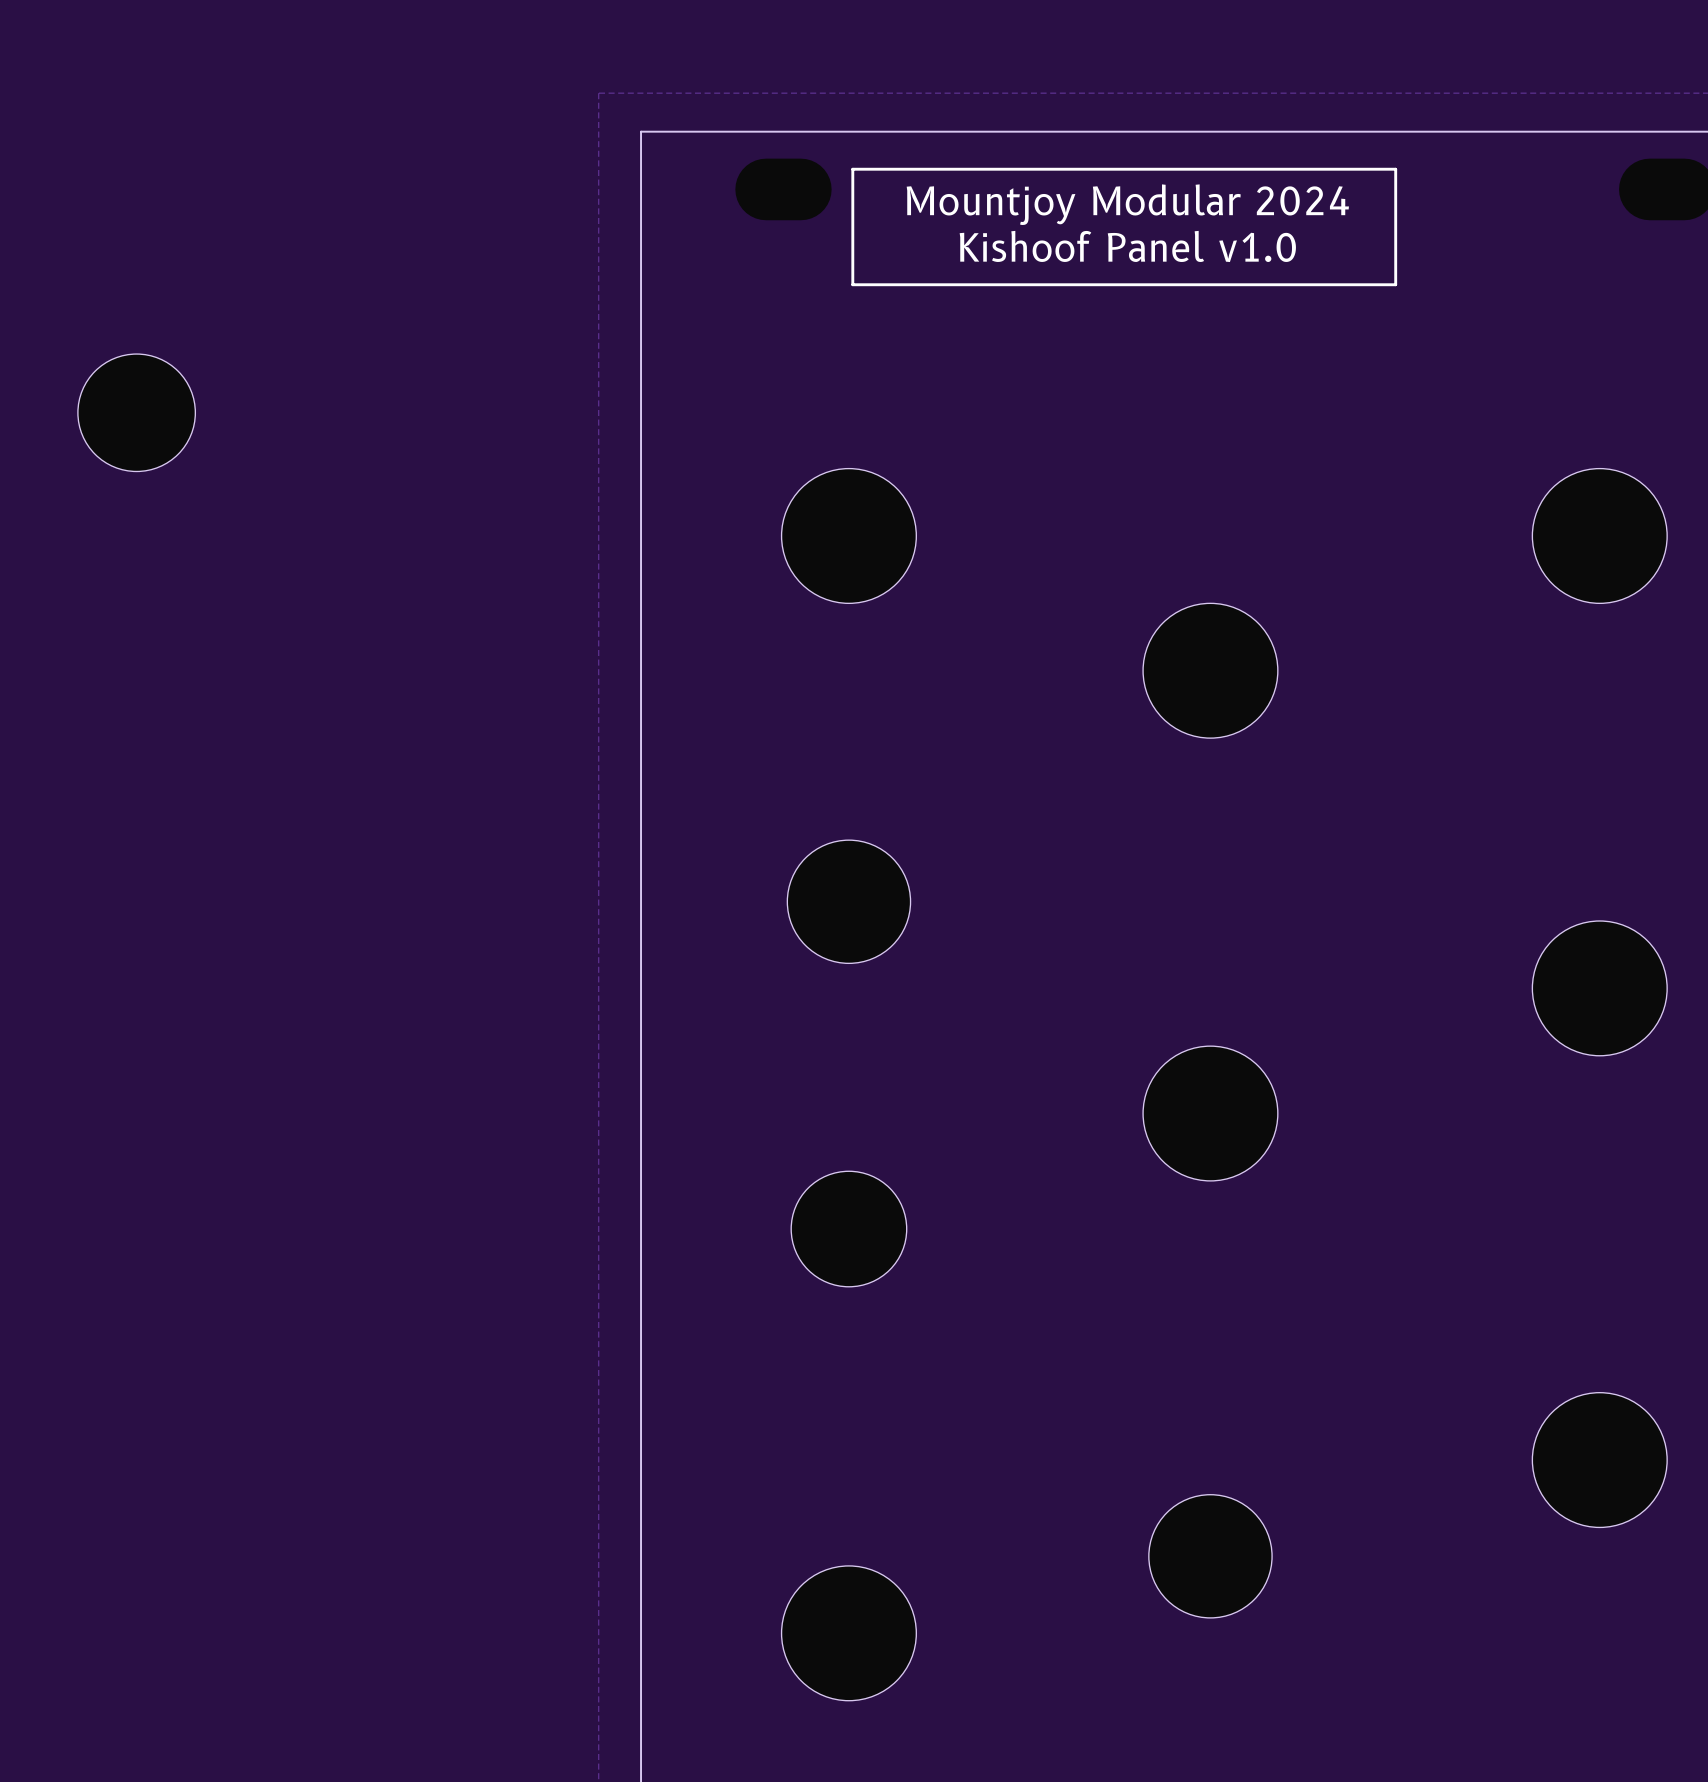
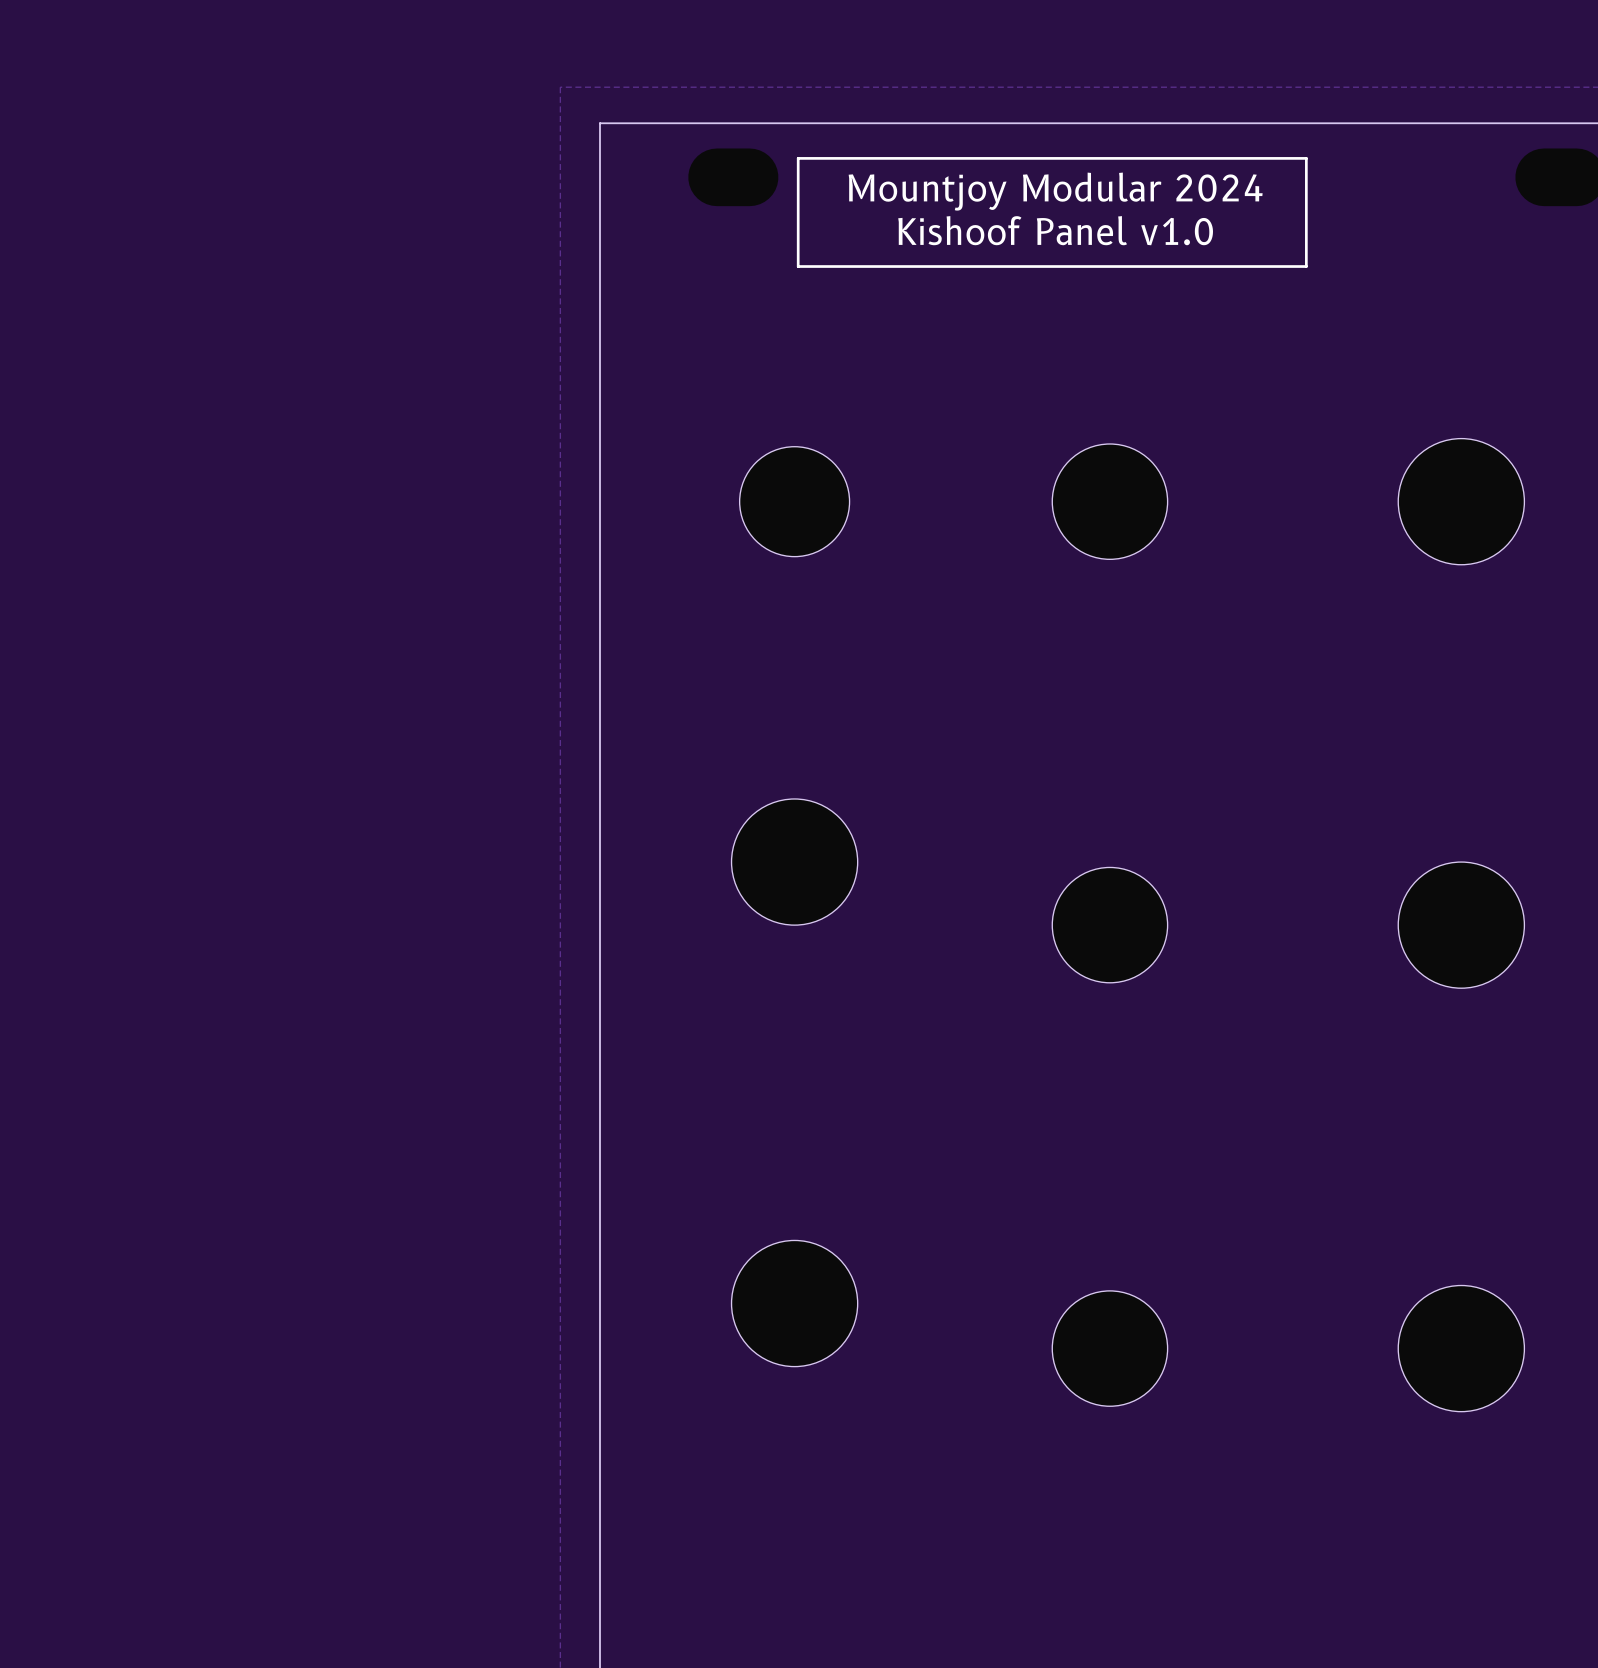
part: (136, 412) -> none
part footprint: [781, 468, 917, 604] -> [739, 446, 850, 557]
part: none -> (1109, 501)
part position: (1599, 535) -> (1461, 501)
part: (1210, 670) -> none
part footprint: [787, 840, 911, 964] -> [731, 798, 858, 926]
part: none -> (1109, 925)
part position: (1599, 988) -> (1461, 925)
part: (1210, 1113) -> none
part: (848, 1229) -> none
part: none -> (794, 1303)
part position: (1599, 1460) -> (1461, 1348)
part position: (1210, 1556) -> (1109, 1348)
part: (848, 1633) -> none

